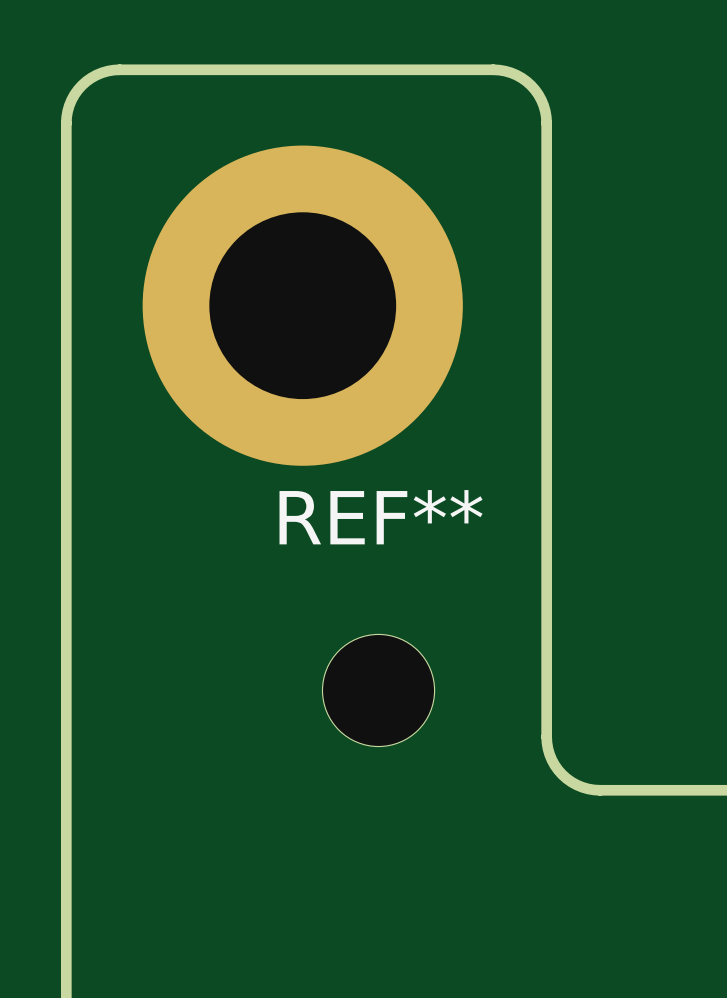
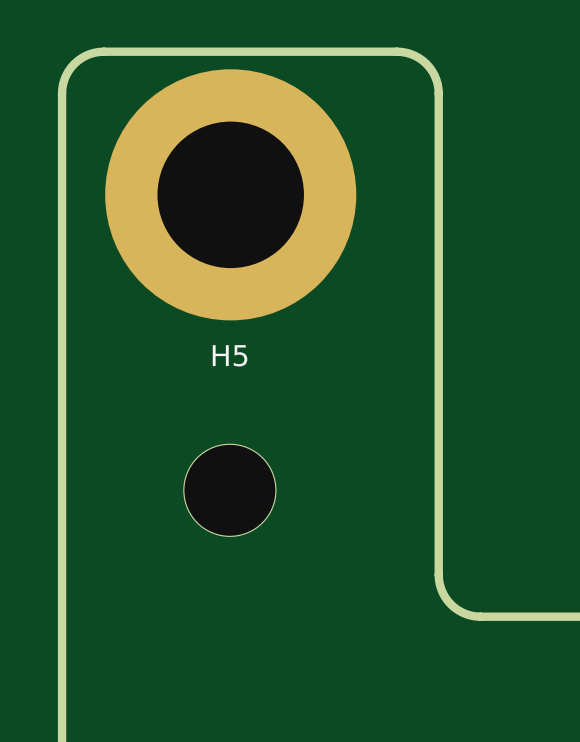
part position: (302, 305) -> (230, 194)
H5: none -> (229, 490)
REF**: (378, 690) -> none

